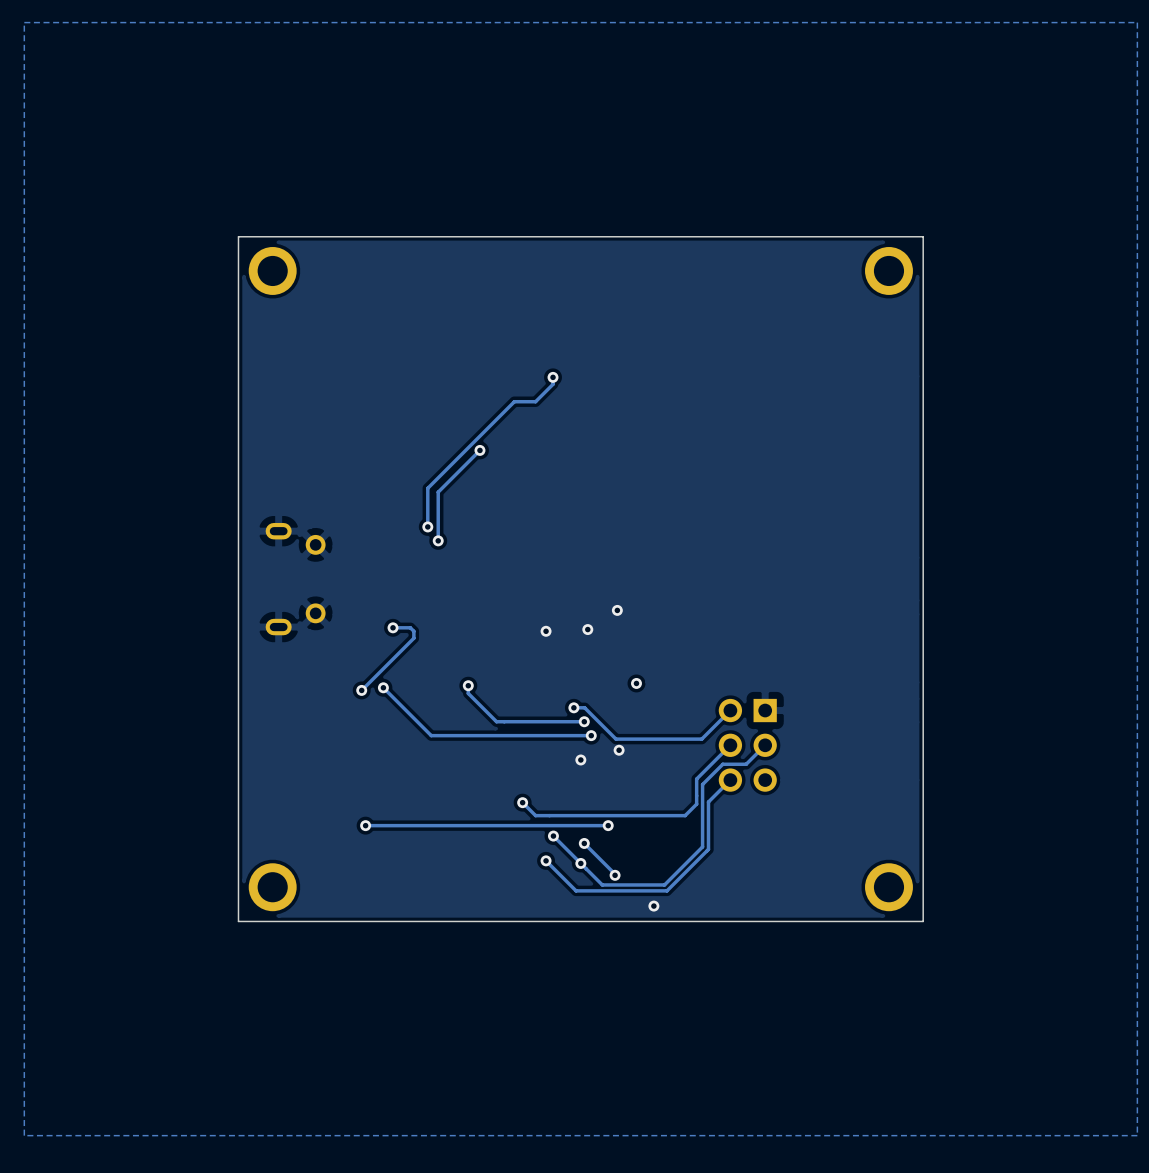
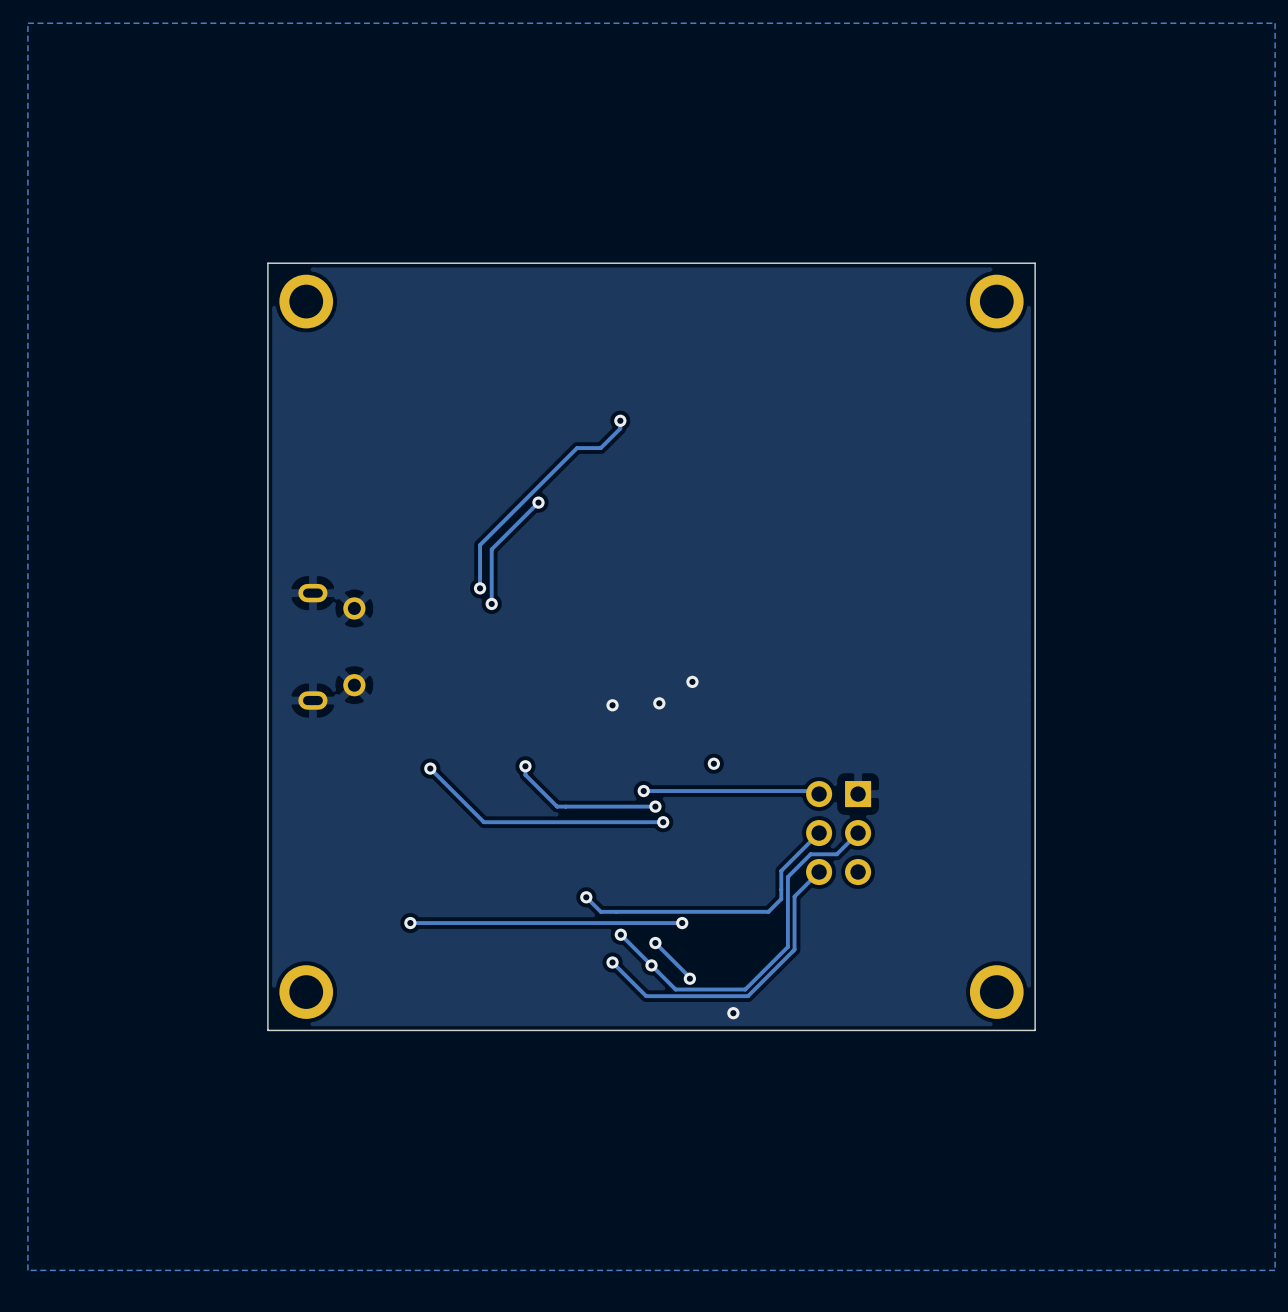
track: (393, 627) (410, 627) (413, 631) (413, 638) (361, 690) -> none
via: (393, 627) -> none
via: (361, 690) -> none
track: (584, 707) (615, 739) (701, 739) (730, 710) -> (655, 791) (816, 791)
via: (619, 750) -> none
via: (580, 759) -> none

